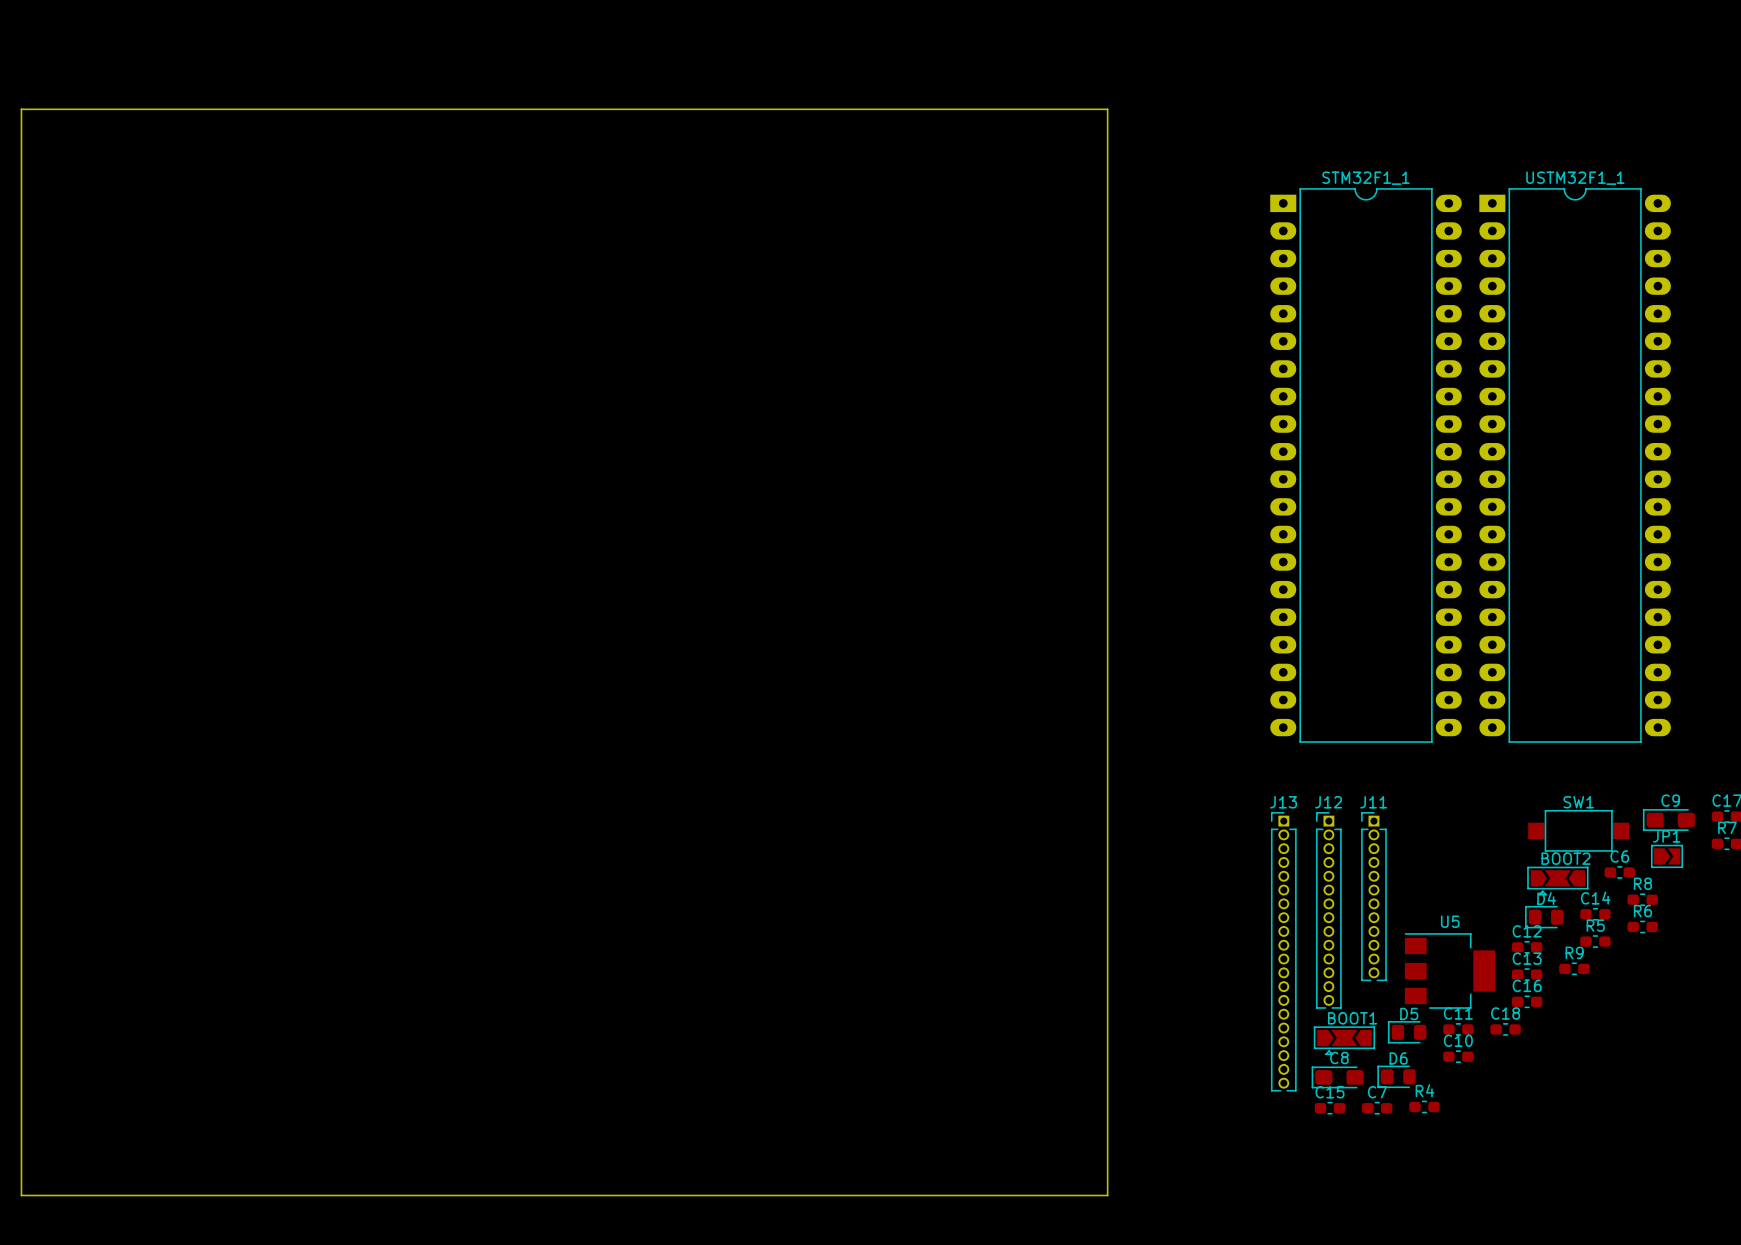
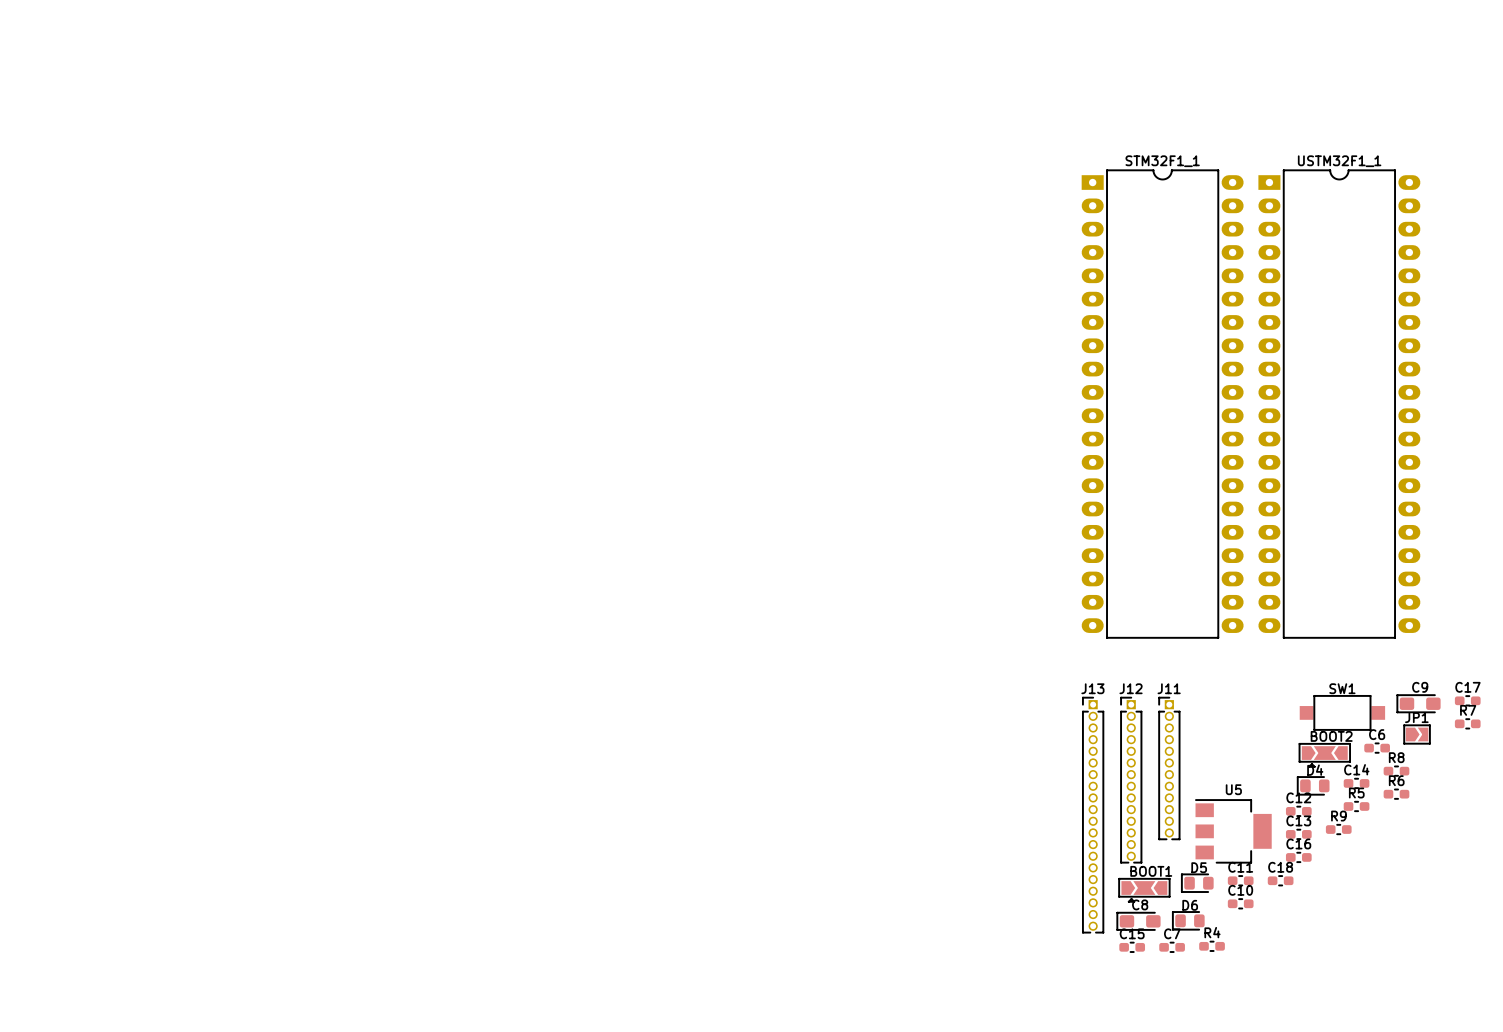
board edge: (21, 109) (1107, 109) (1107, 1195) (21, 1195) (21, 109) -> none

